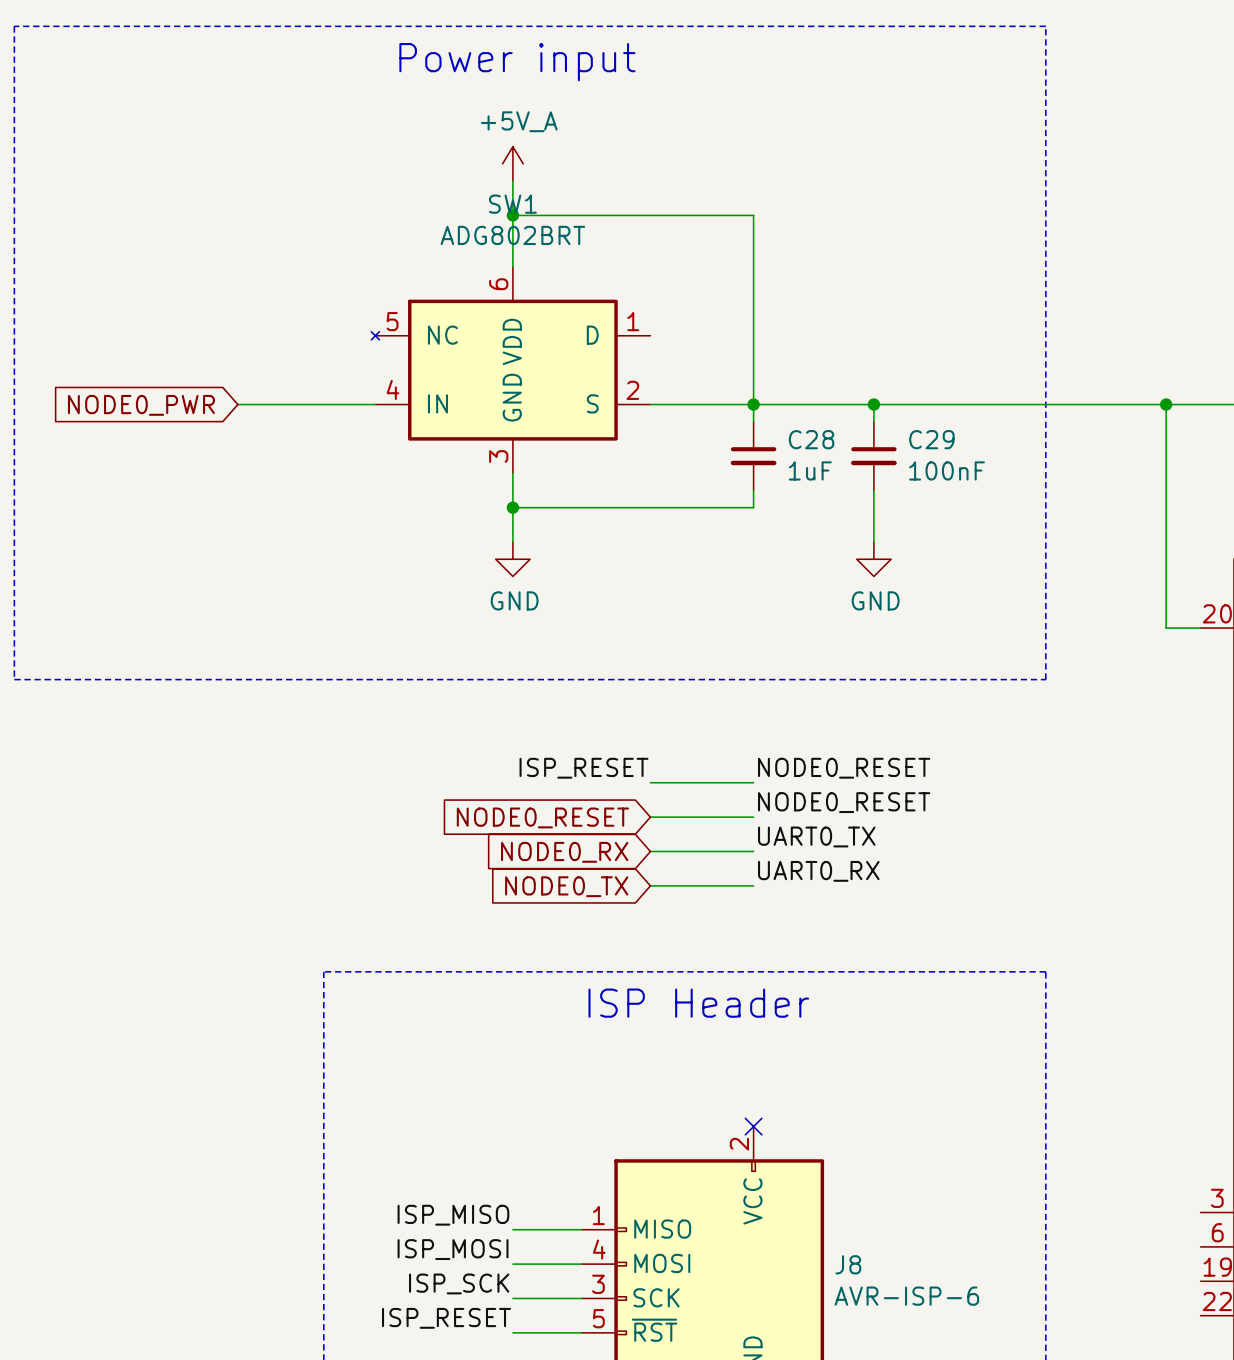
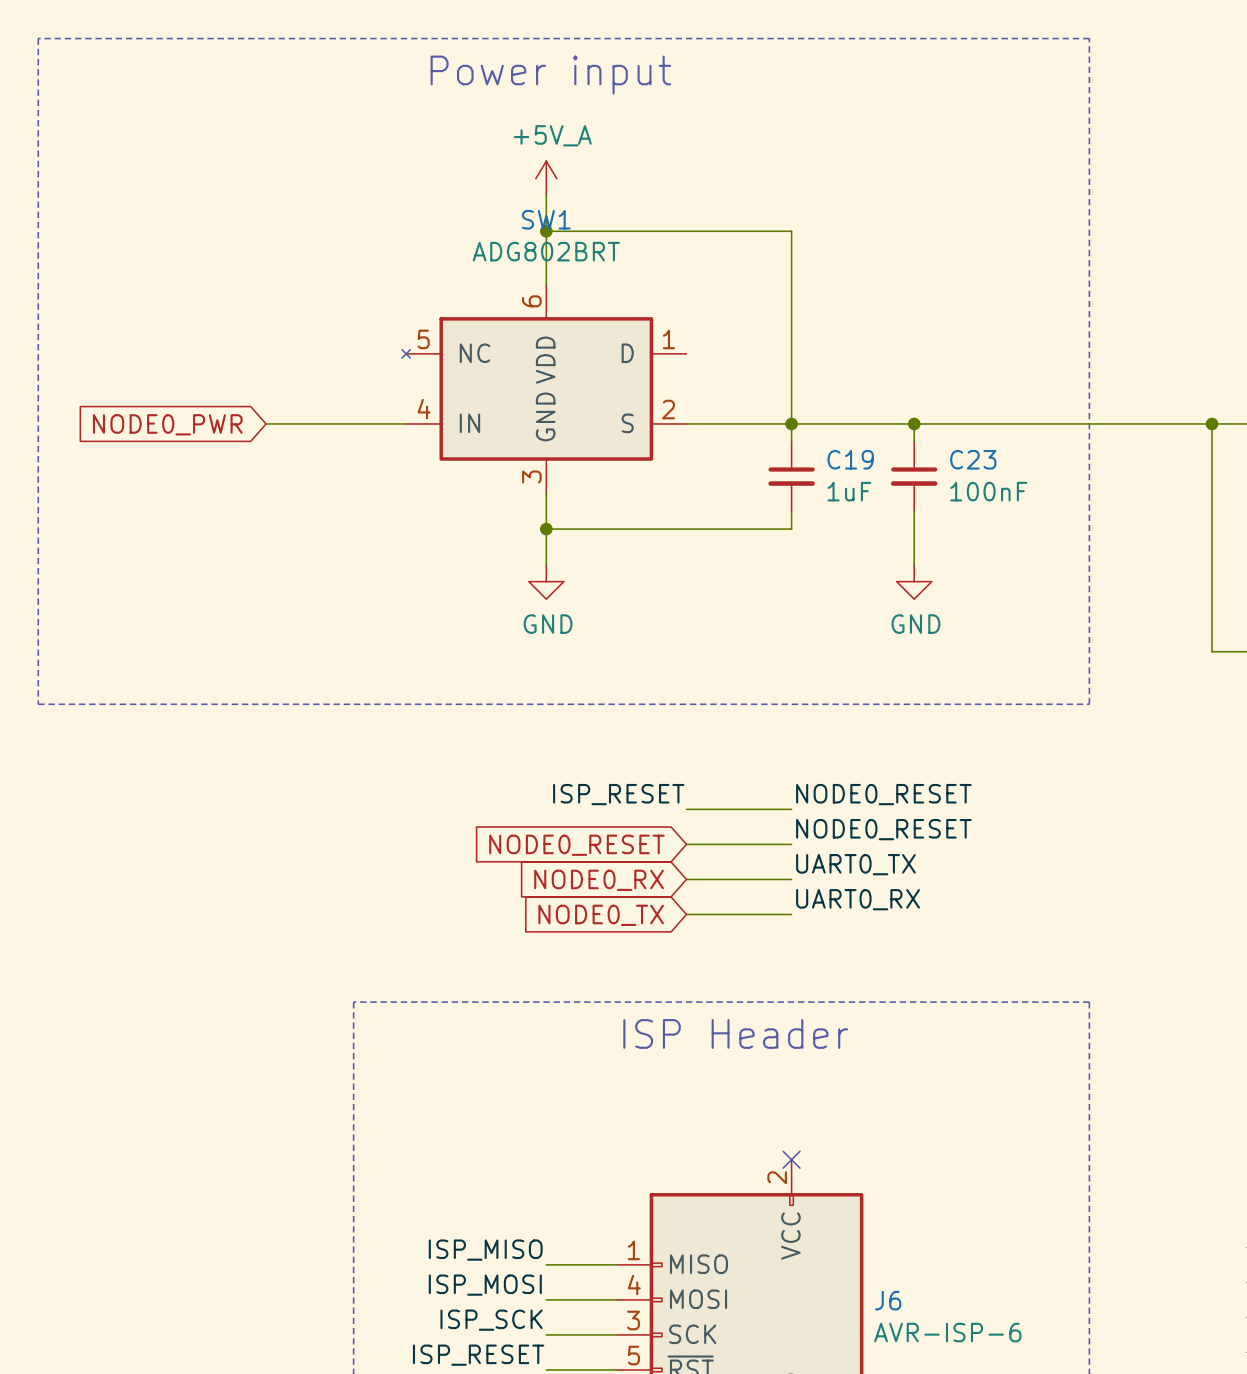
C28 name: C28 (811, 439) -> C19 (850, 459)
C29 name: C29 (931, 439) -> C23 (973, 459)
J8 name: J8 (848, 1264) -> J6 (888, 1300)

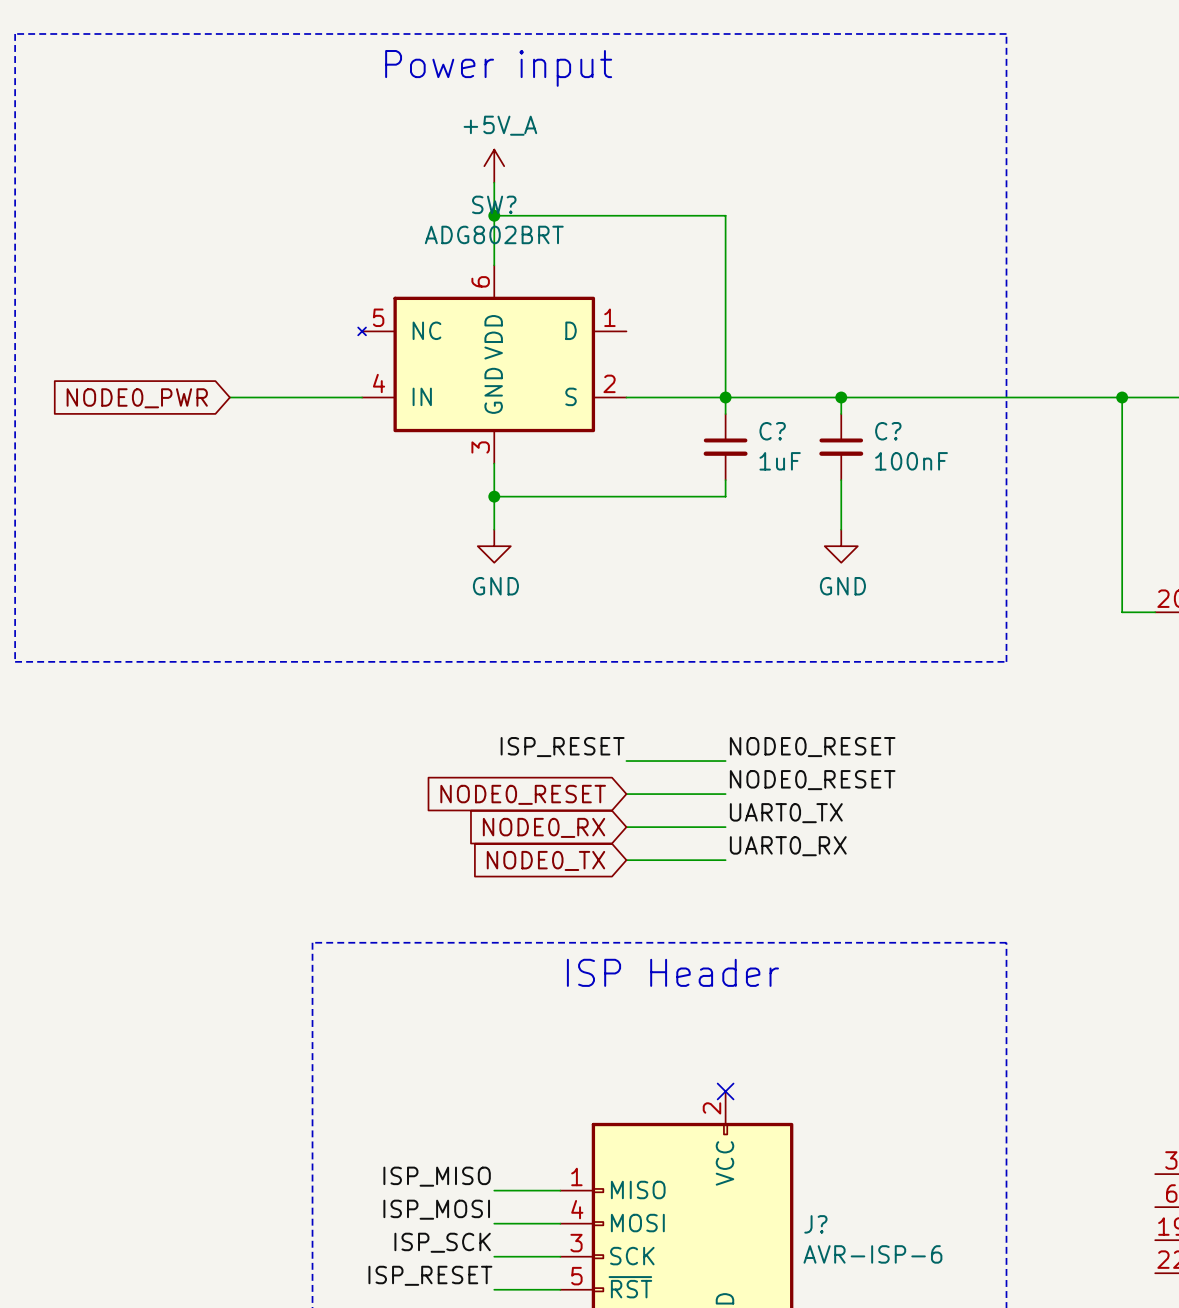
SW1 name: SW1 (546, 219) -> SW? (494, 204)
C19 name: C19 (850, 459) -> C? (772, 431)
C23 name: C23 (973, 459) -> C? (888, 431)
J6 name: J6 (888, 1300) -> J? (815, 1224)

